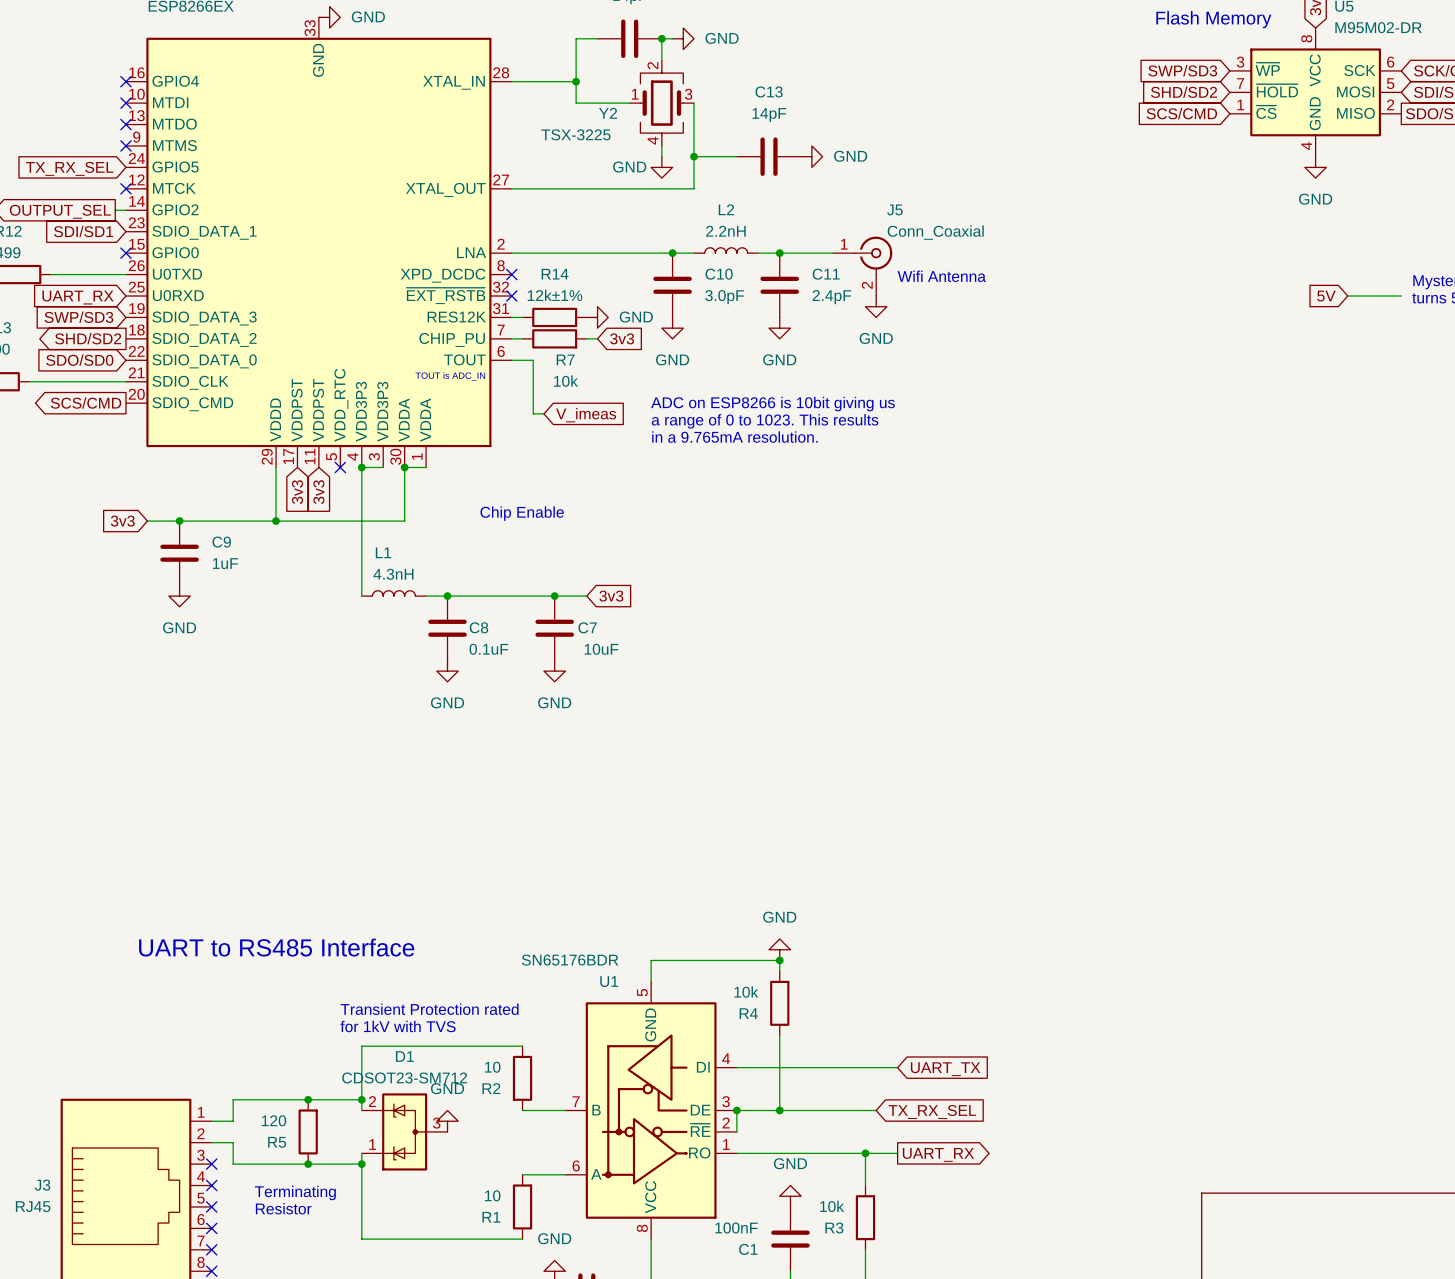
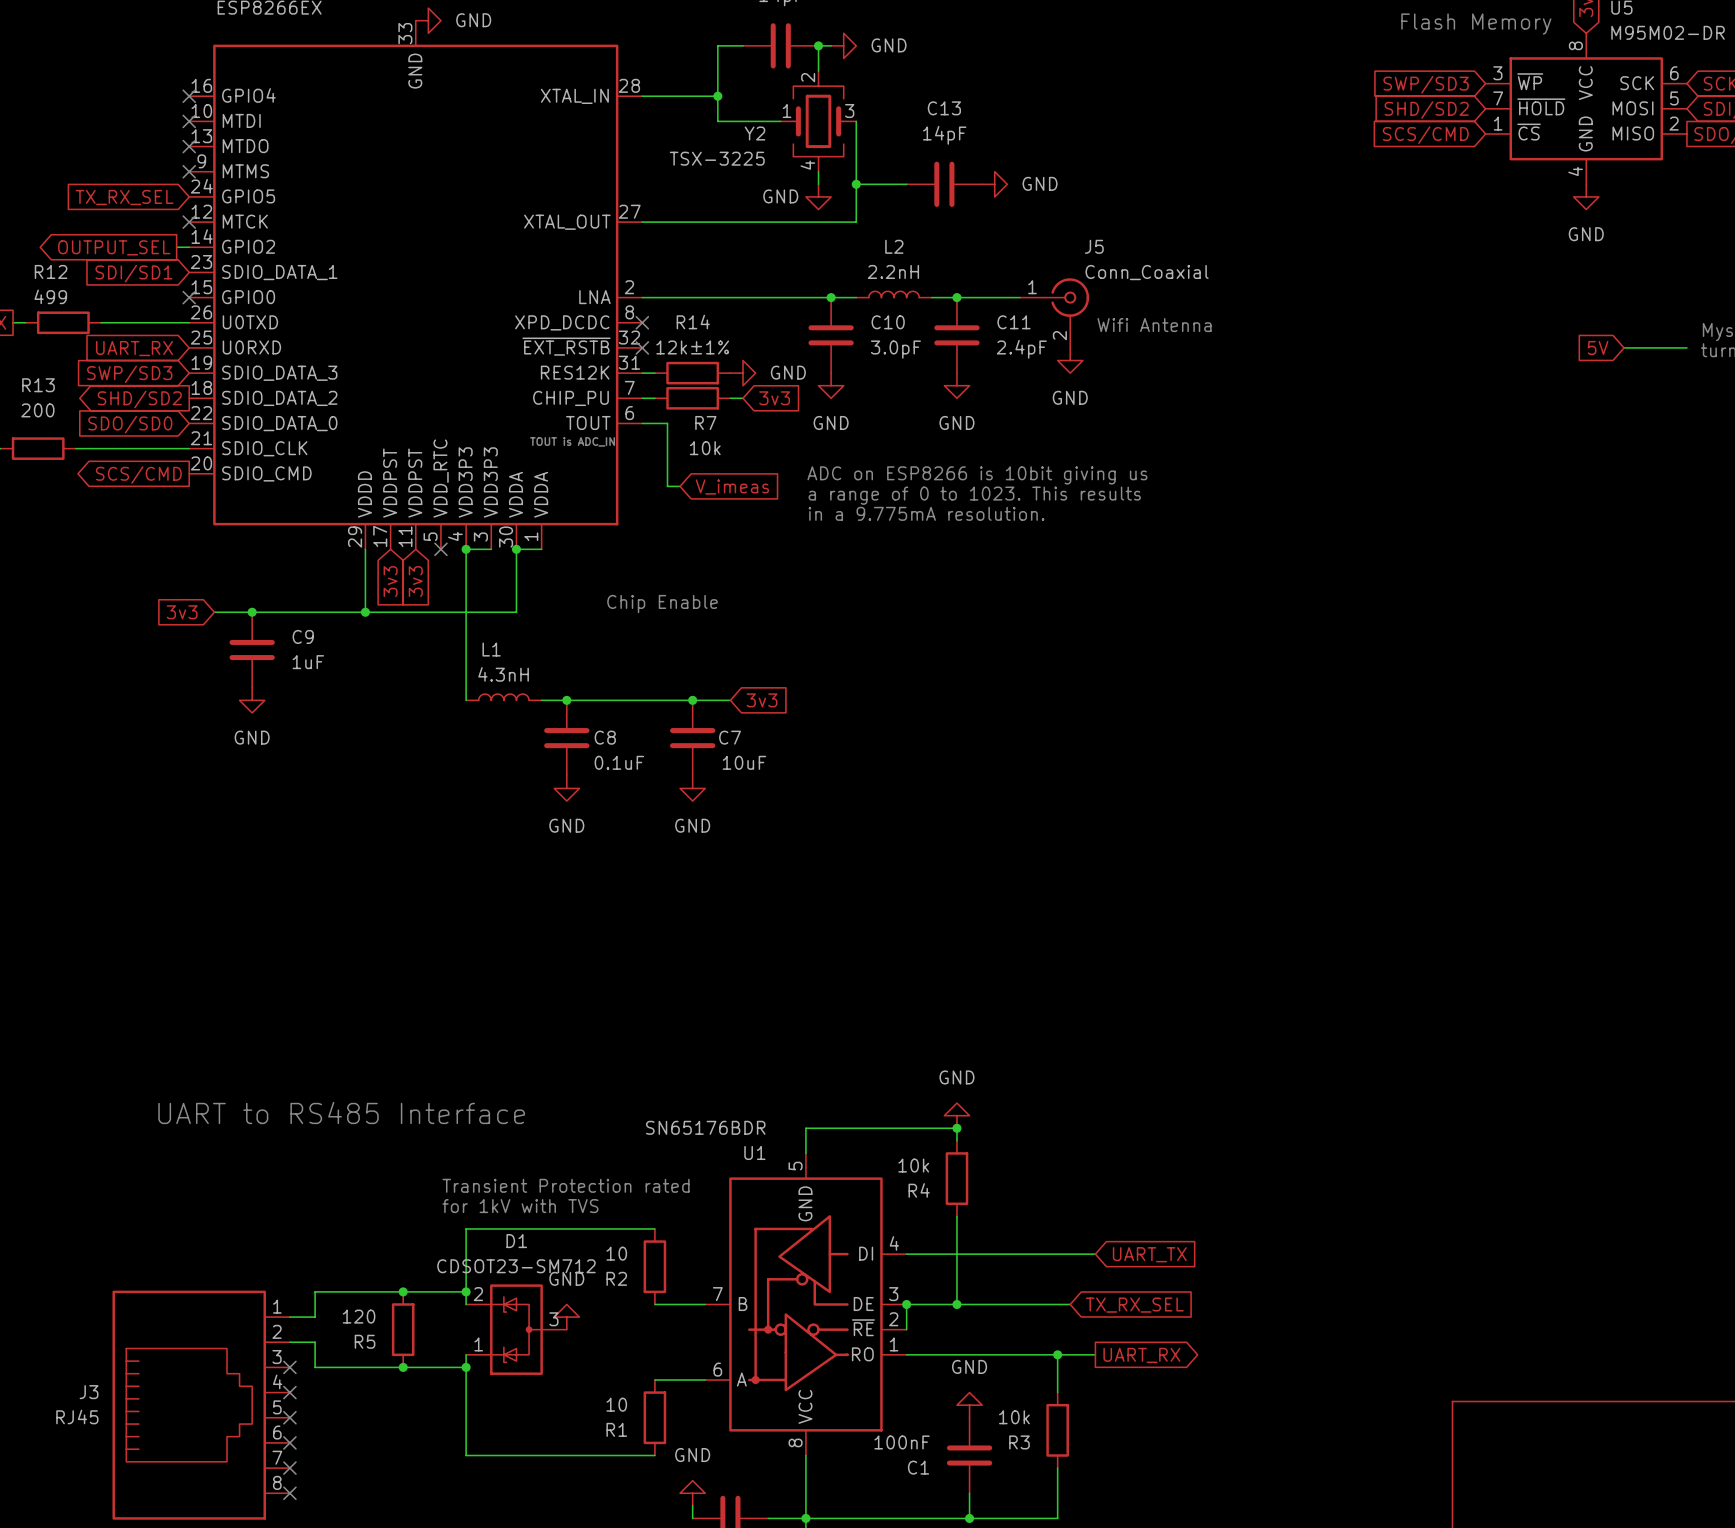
text: in a 9.765mA resolution. (734, 437) -> in a 9.775mA resolution. (926, 513)
text: Terminating (295, 1192) -> none
text: Resistor (283, 1208) -> none

